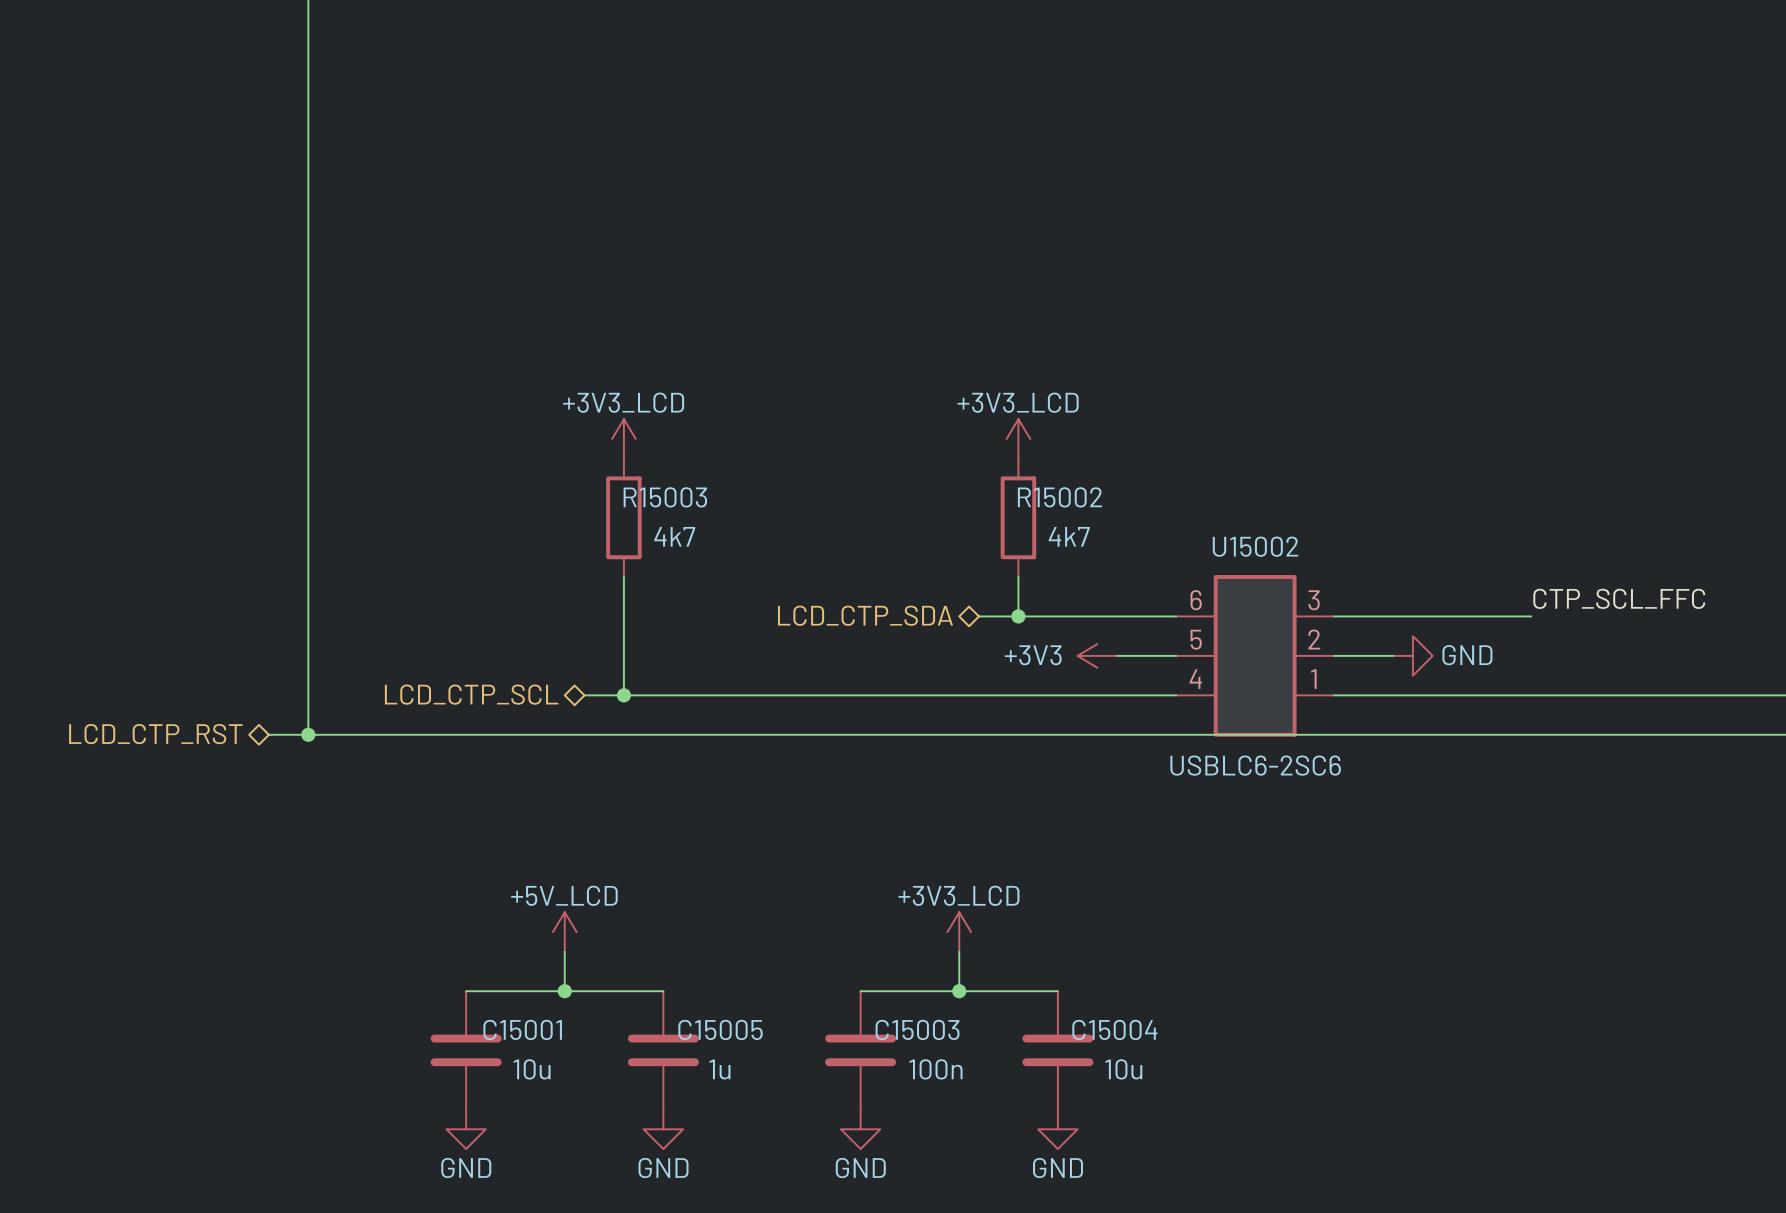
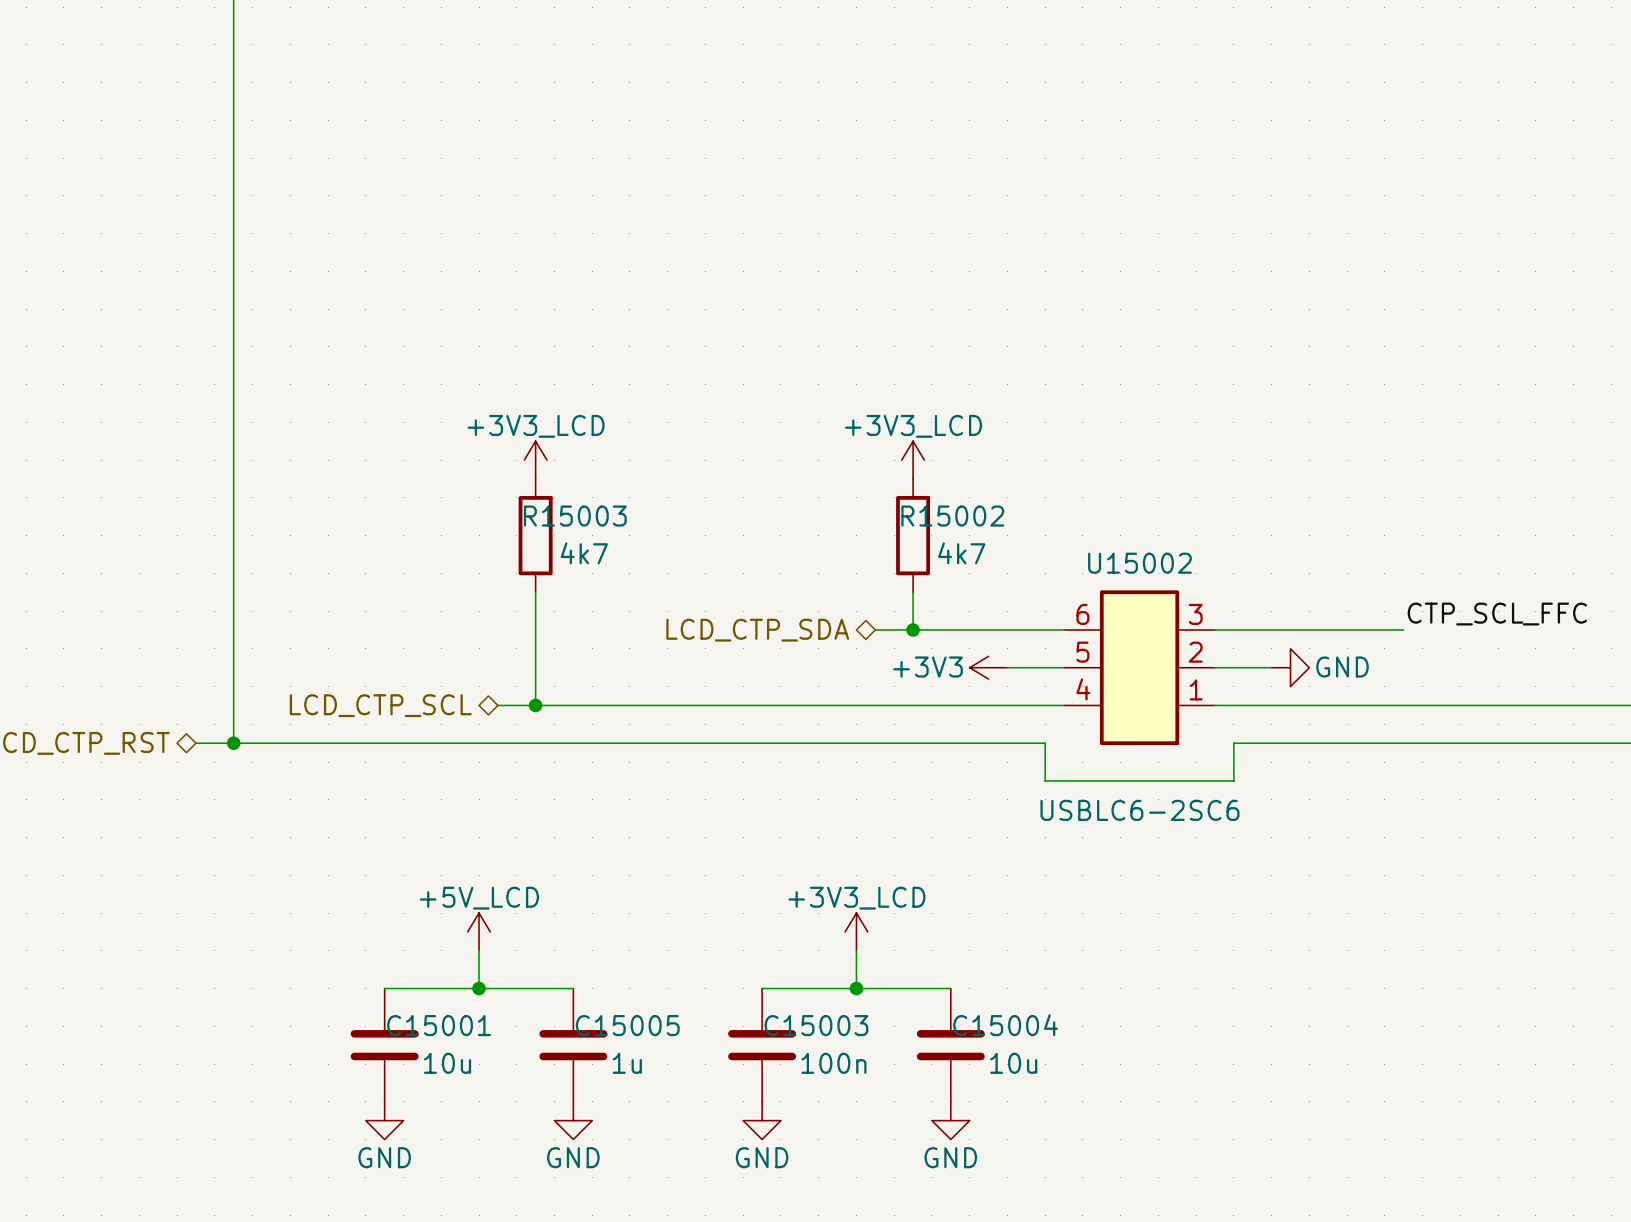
wire: (1156, 734) (1353, 734) -> (1045, 743) (1045, 780) (1233, 780) (1233, 743)
U15002 value position: USBLC6-2SC6 (1255, 765) -> USBLC6-2SC6 (1139, 810)

